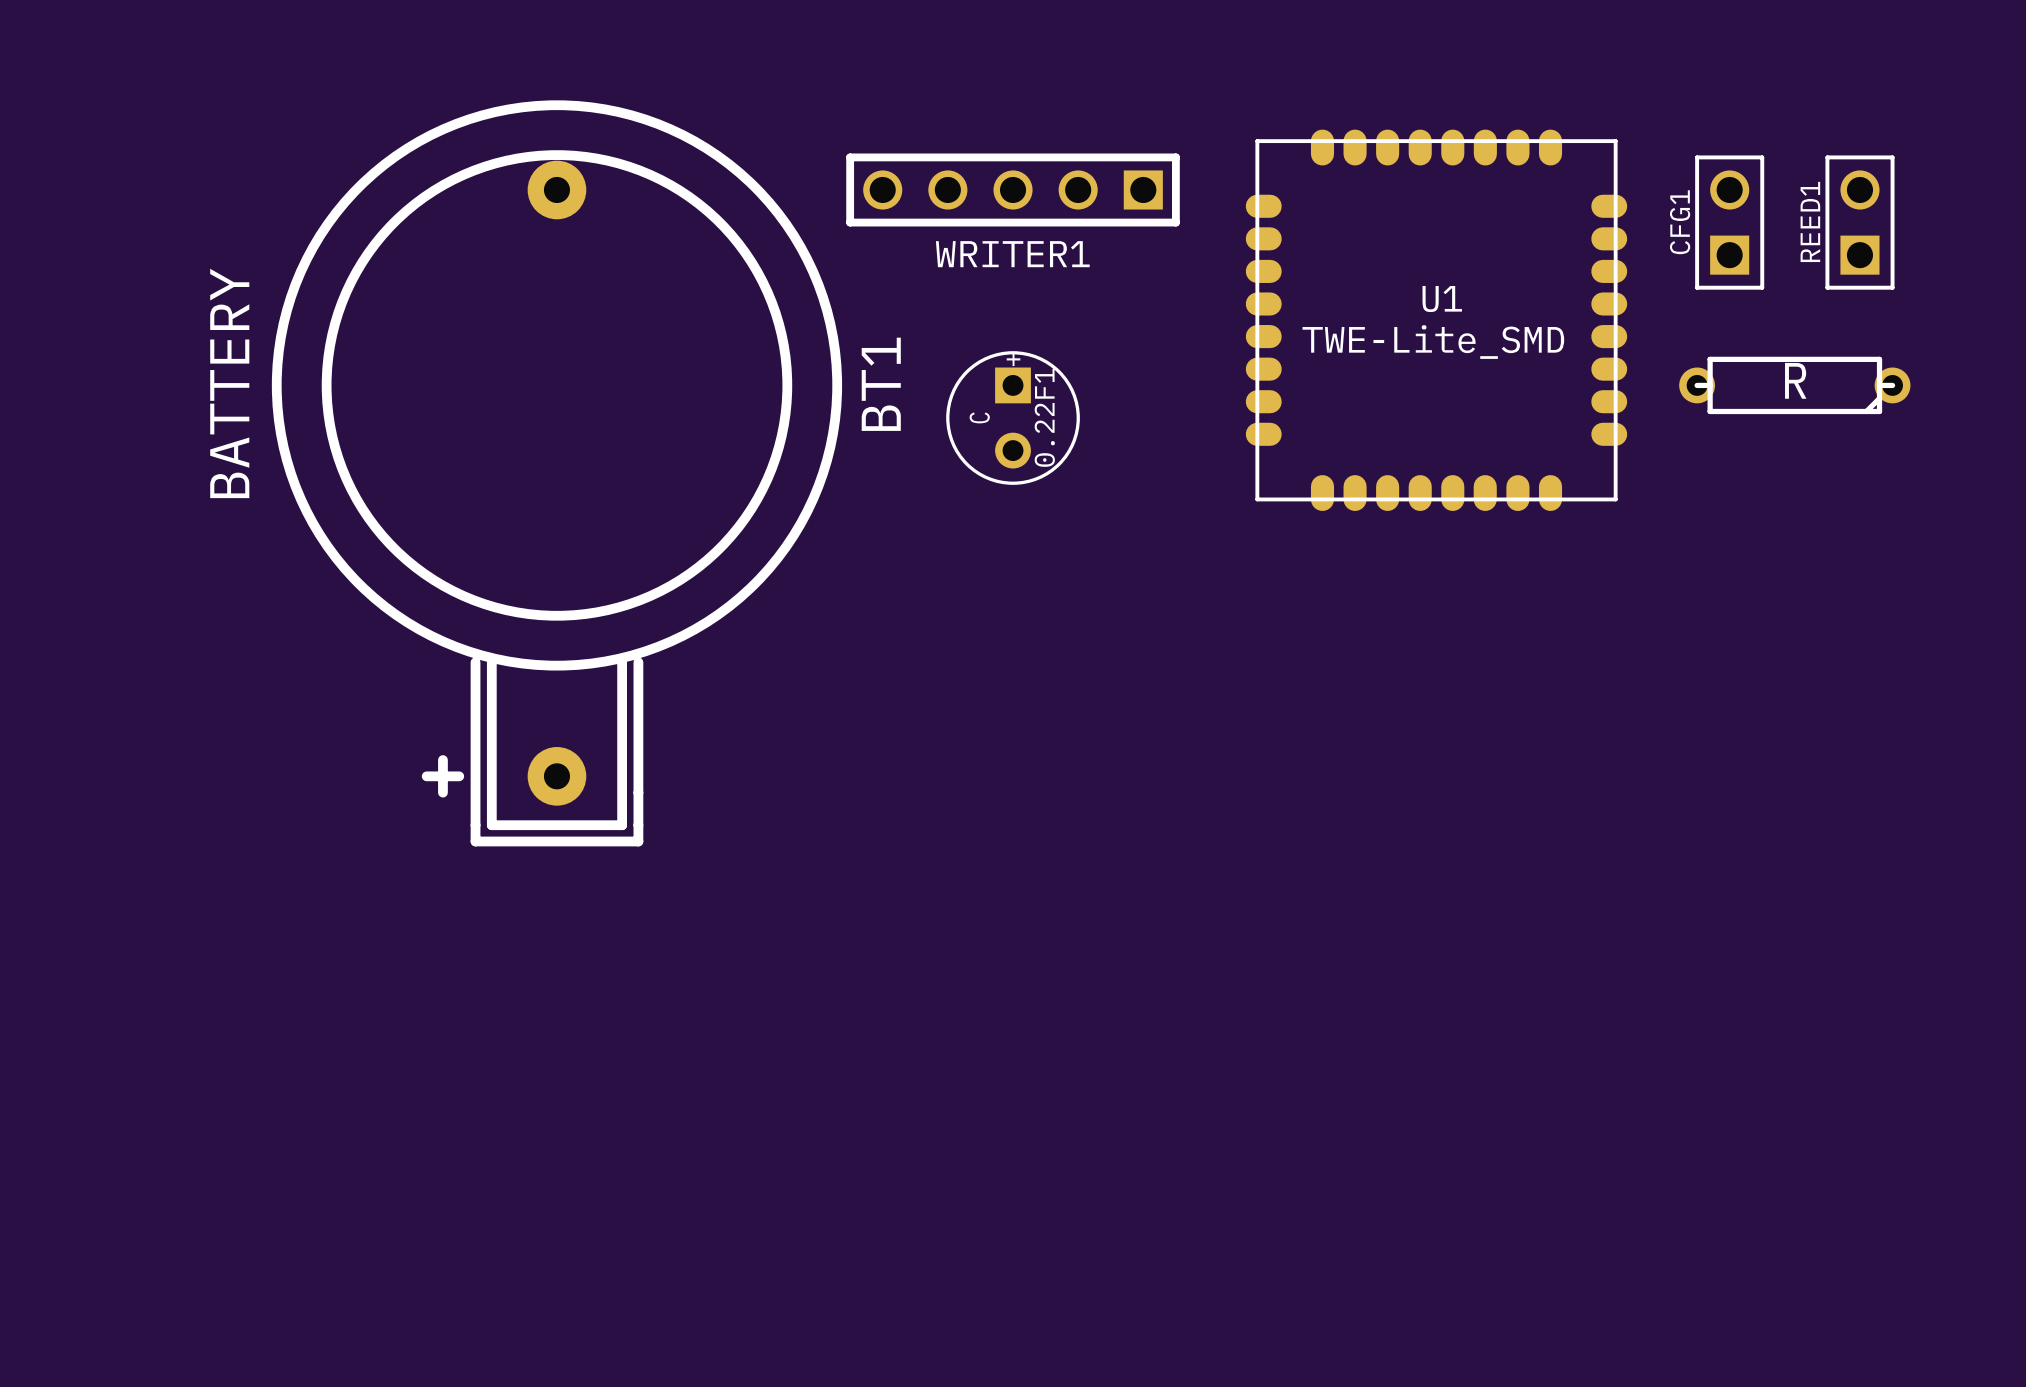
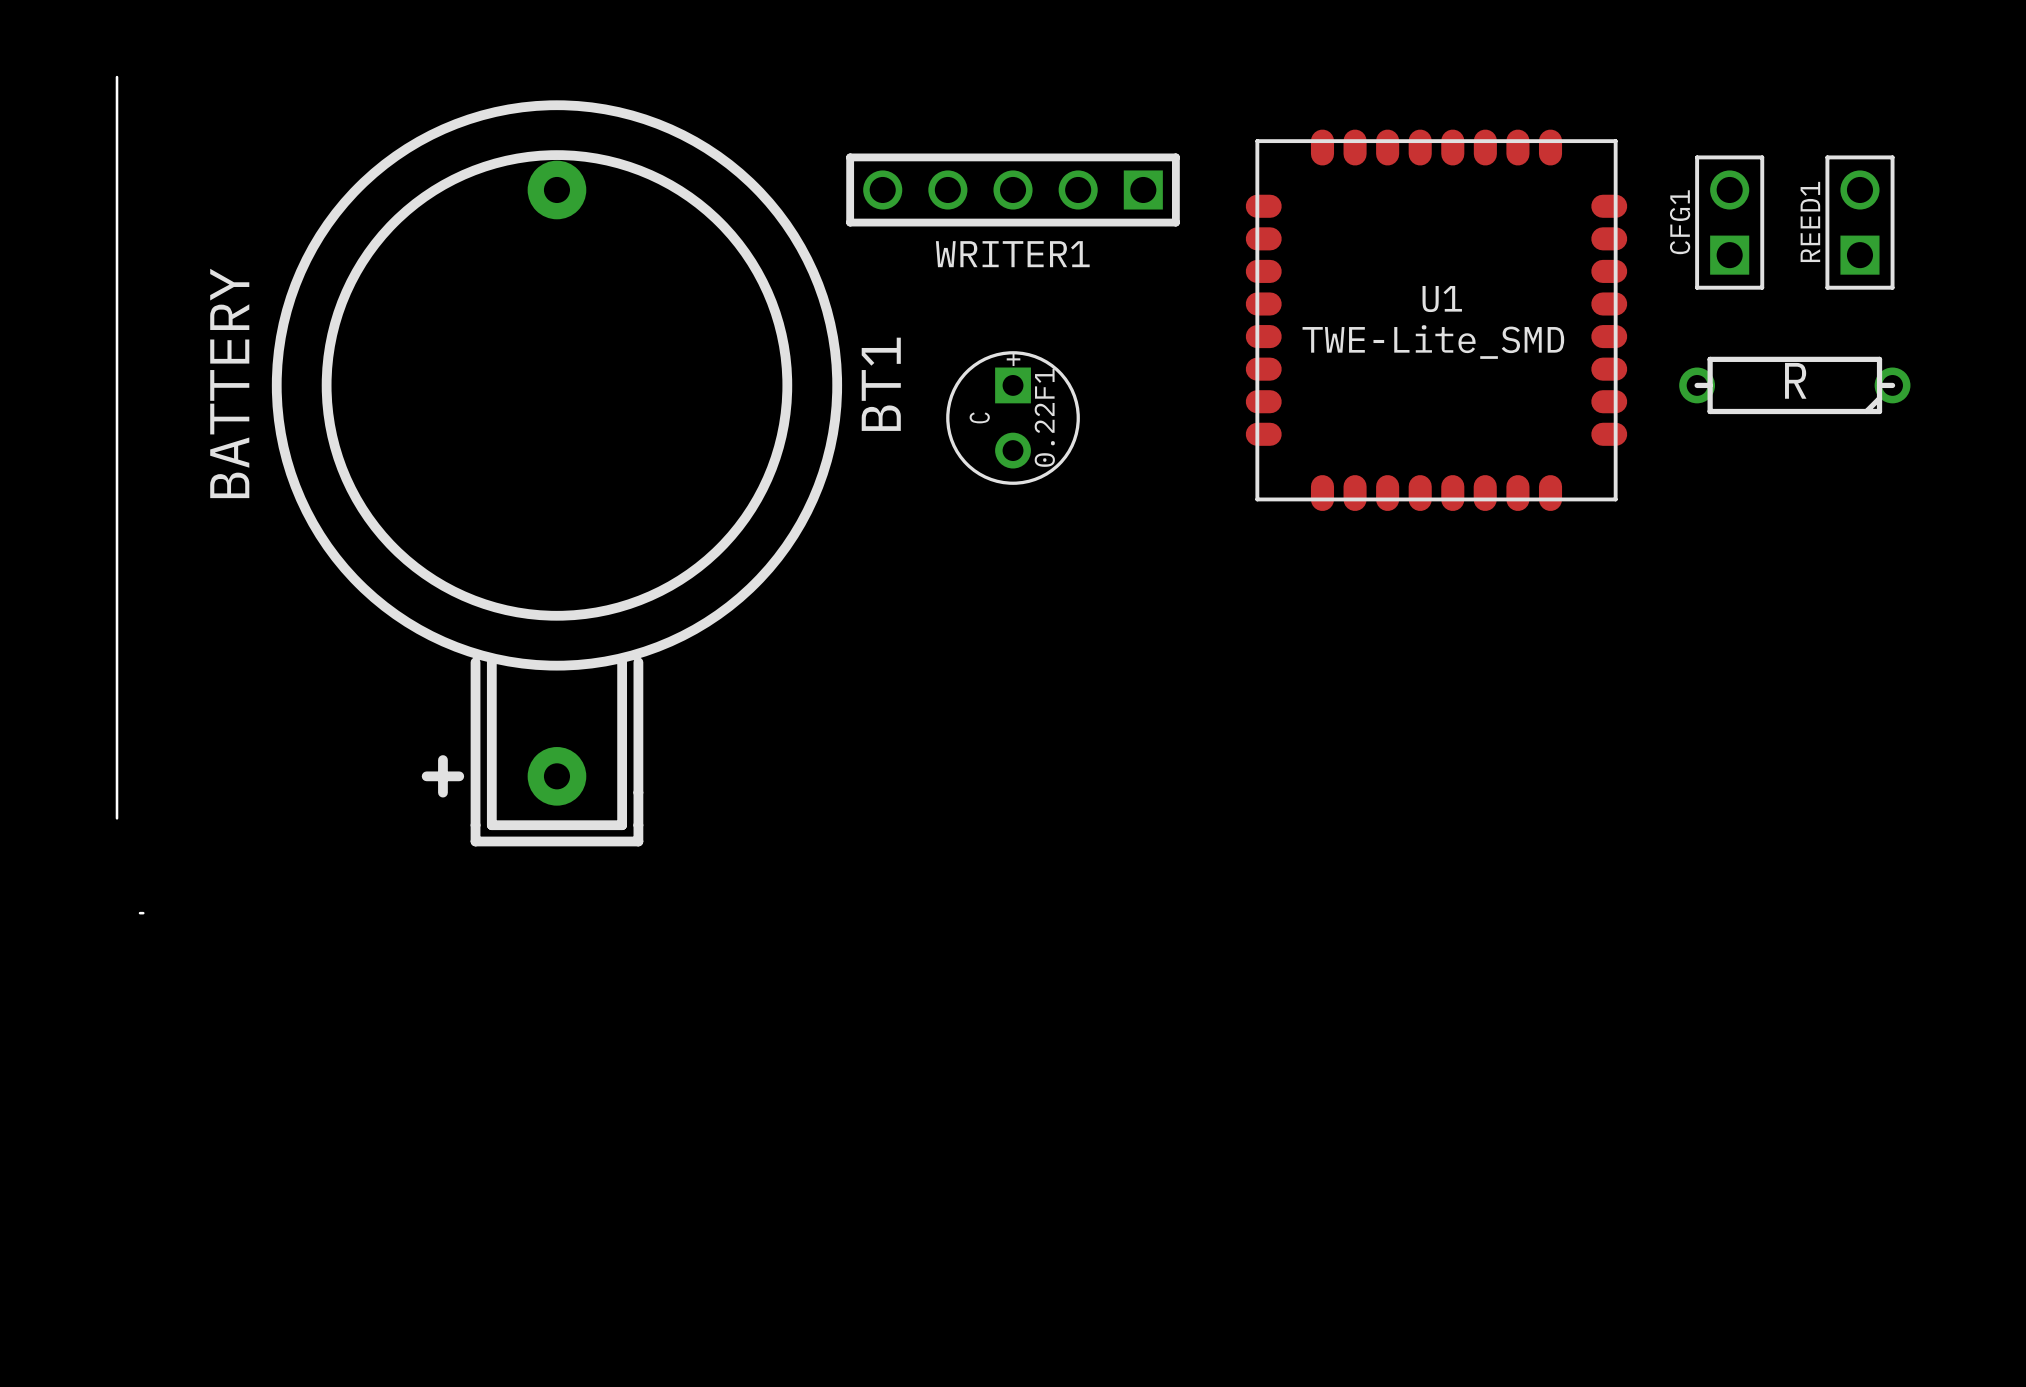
board edge: none -> (117, 77) (117, 818)
board edge: none -> (140, 913) (143, 913)

